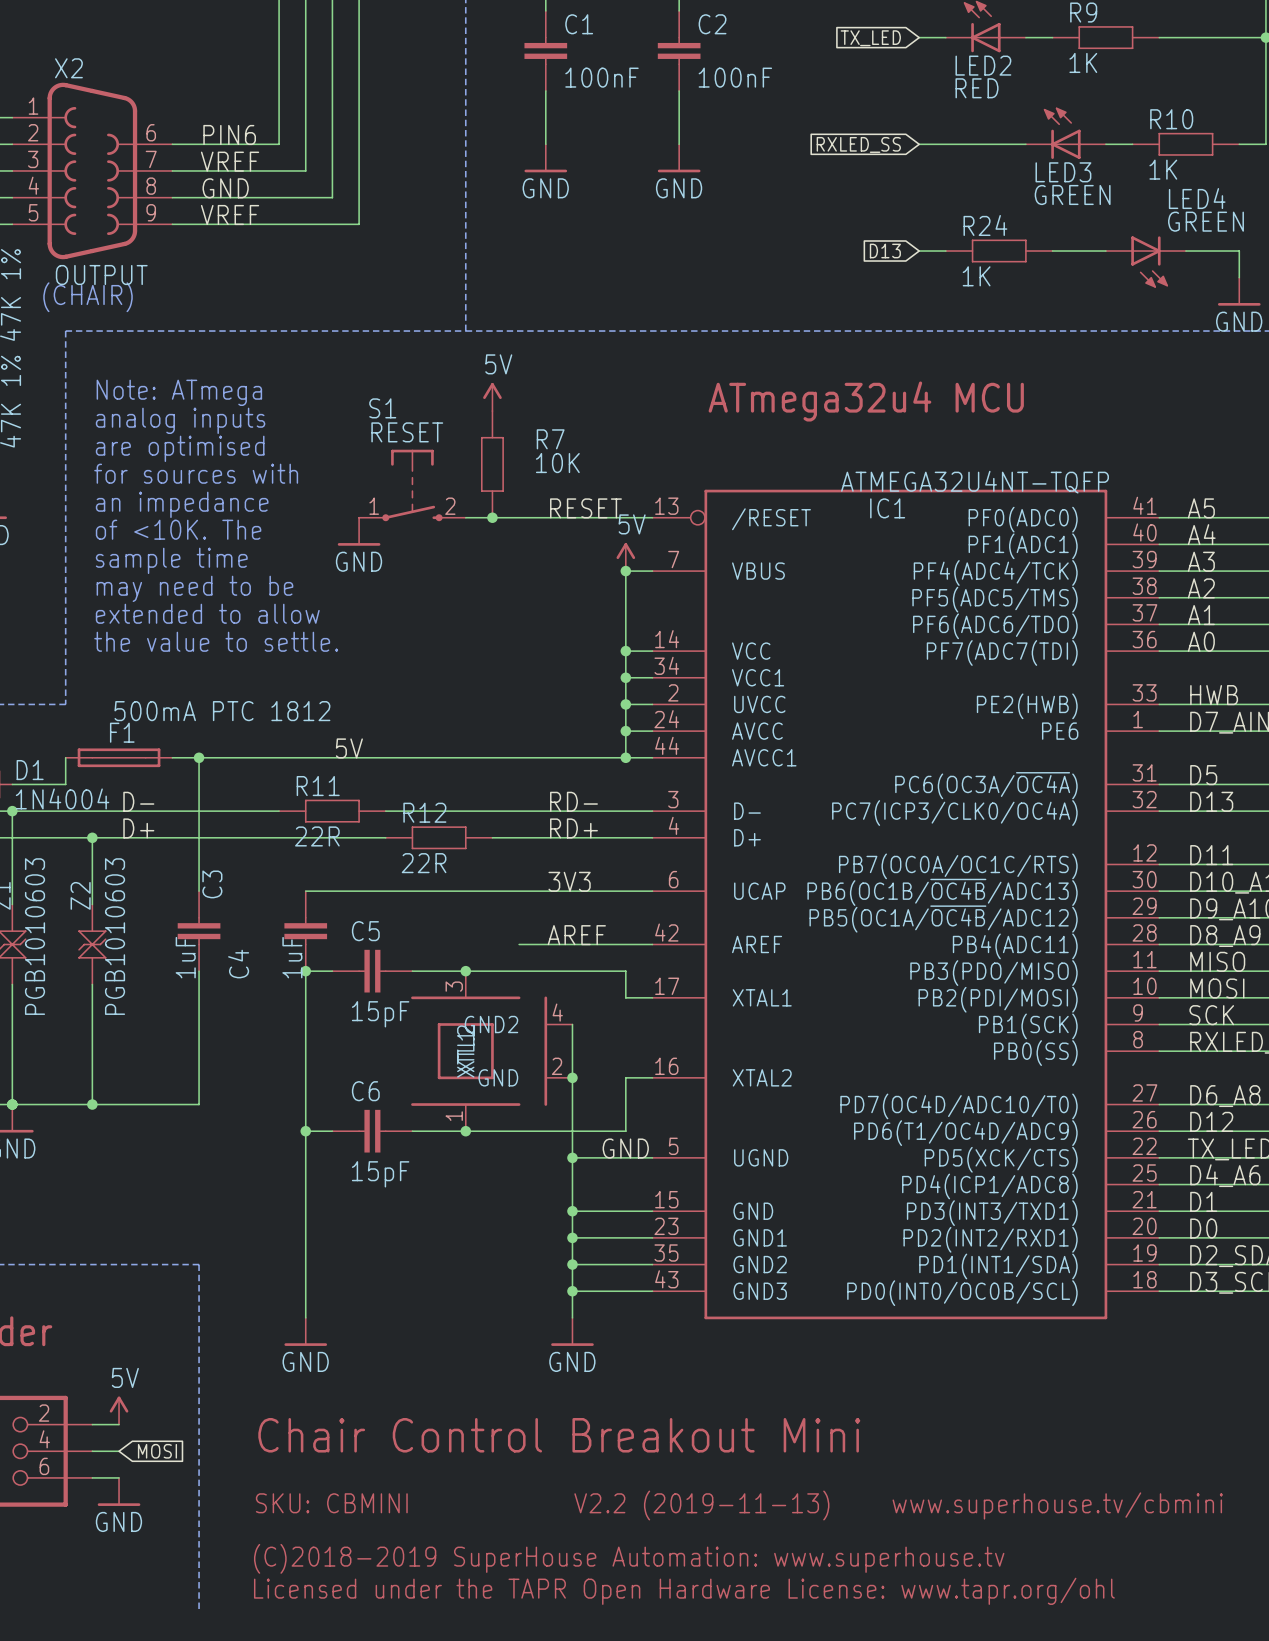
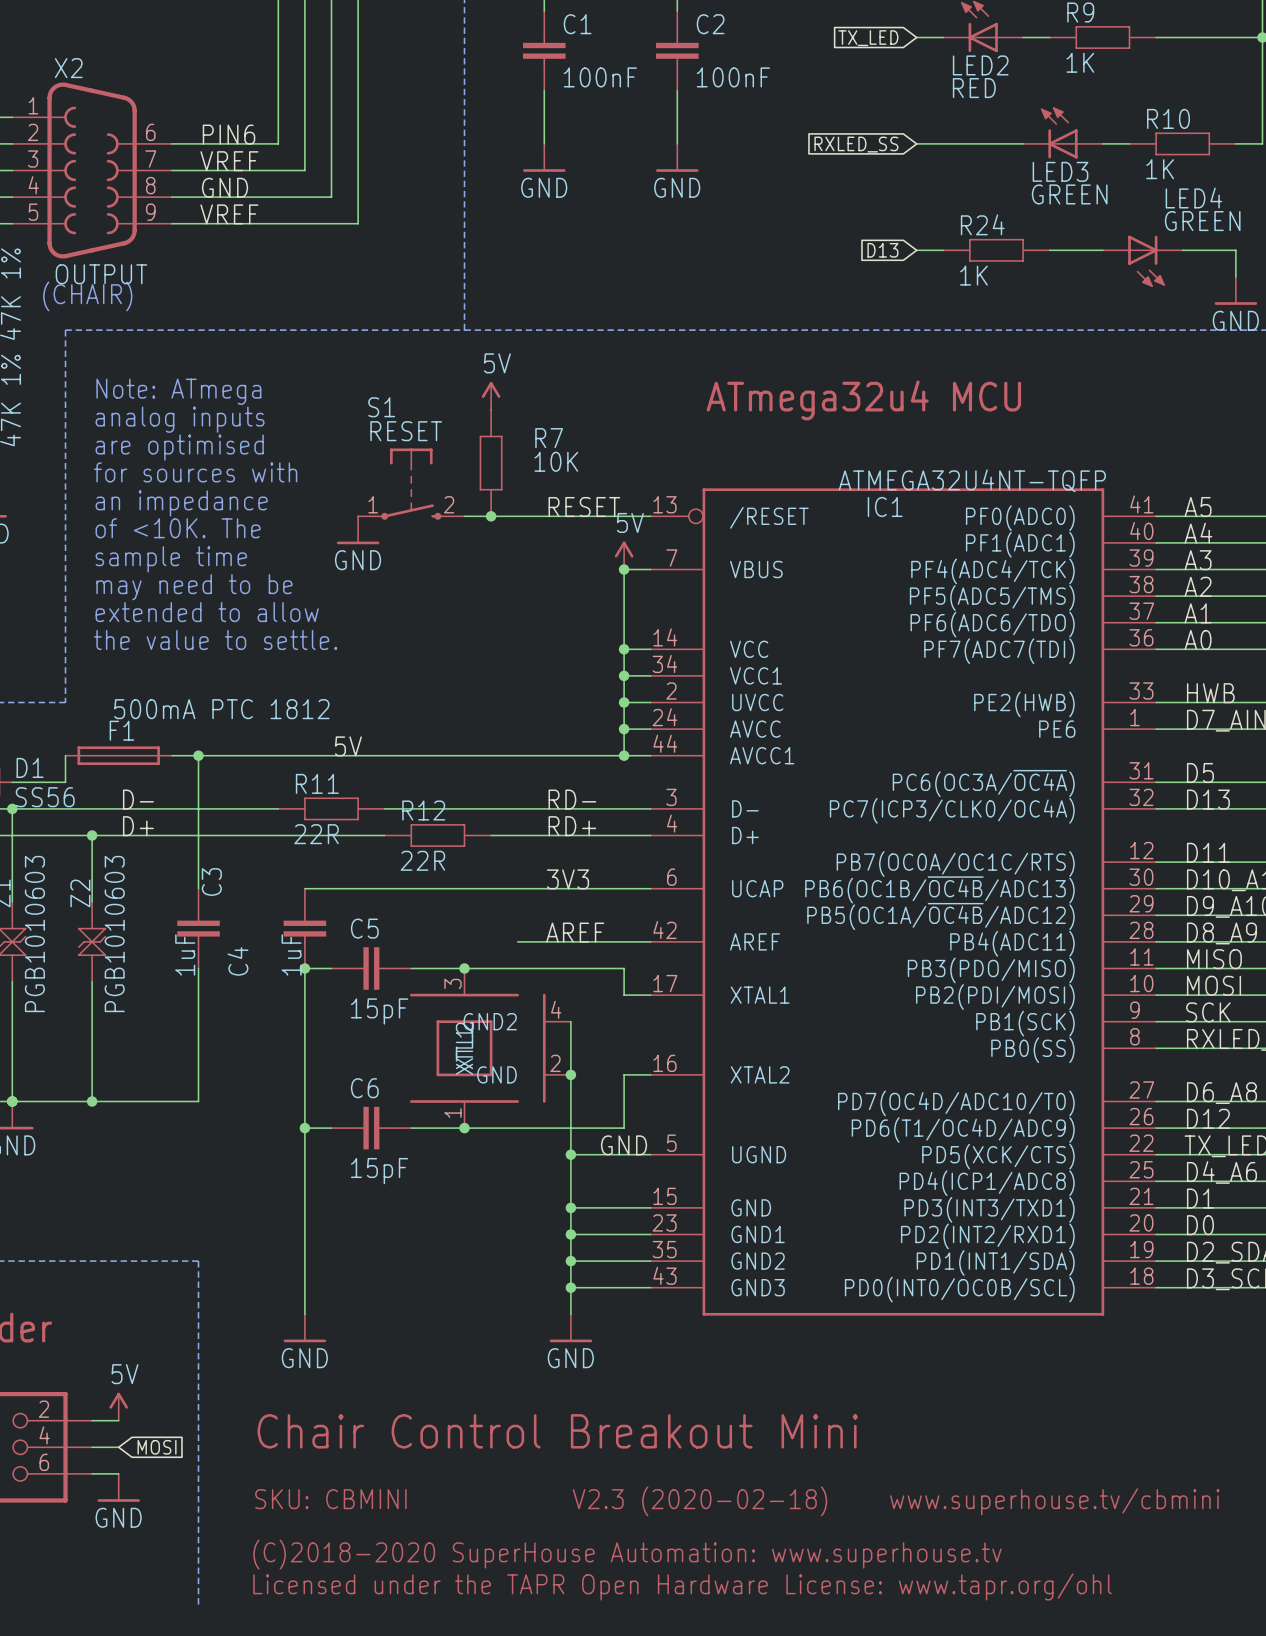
D1 value: 1N4004 (62, 798) -> SS56 (45, 797)
text: V2.2 (2019-11-13) (701, 1505) -> V2.3 (2020-02-18) (699, 1501)
text: (C)2018-2019 SuperHouse Automation: www.superhouse.tv (629, 1558) -> (C)2018-2020 SuperHouse Automation: www.superhouse.tv (627, 1554)

